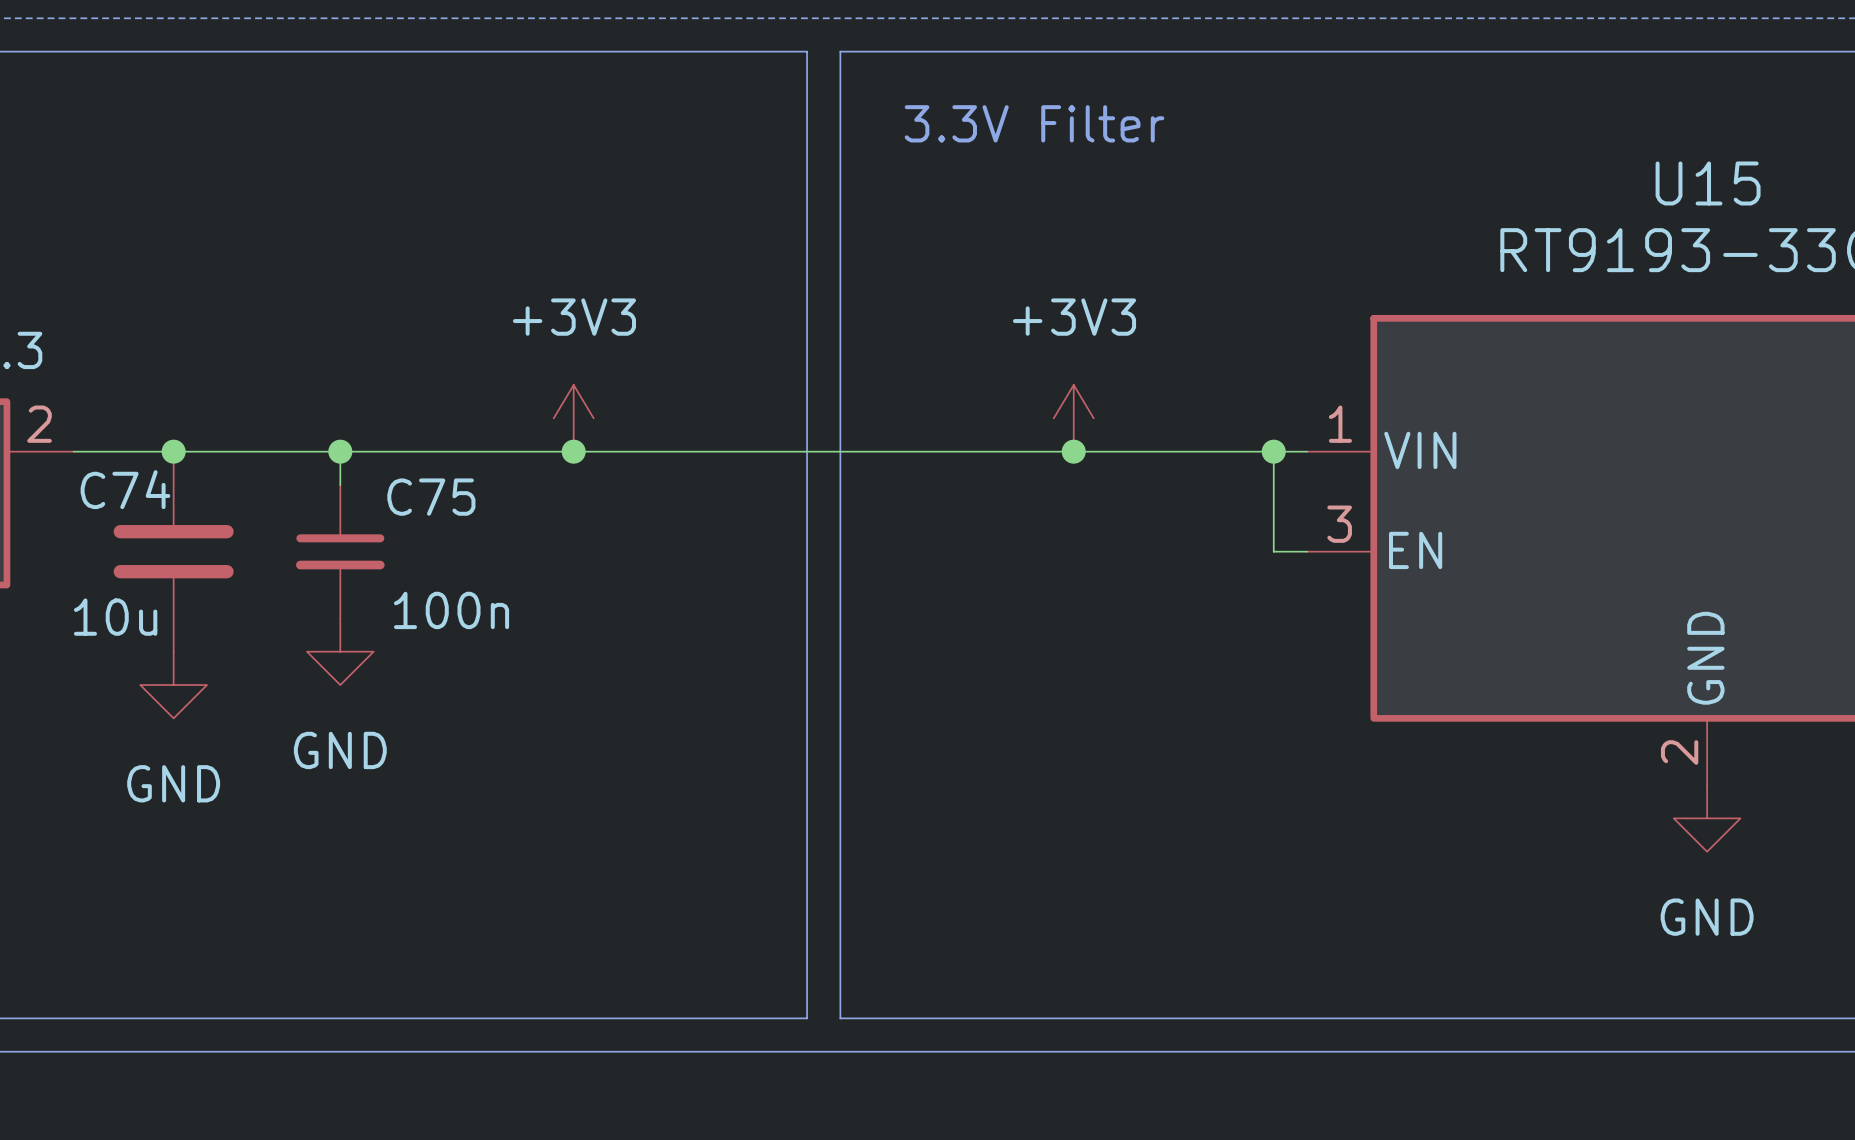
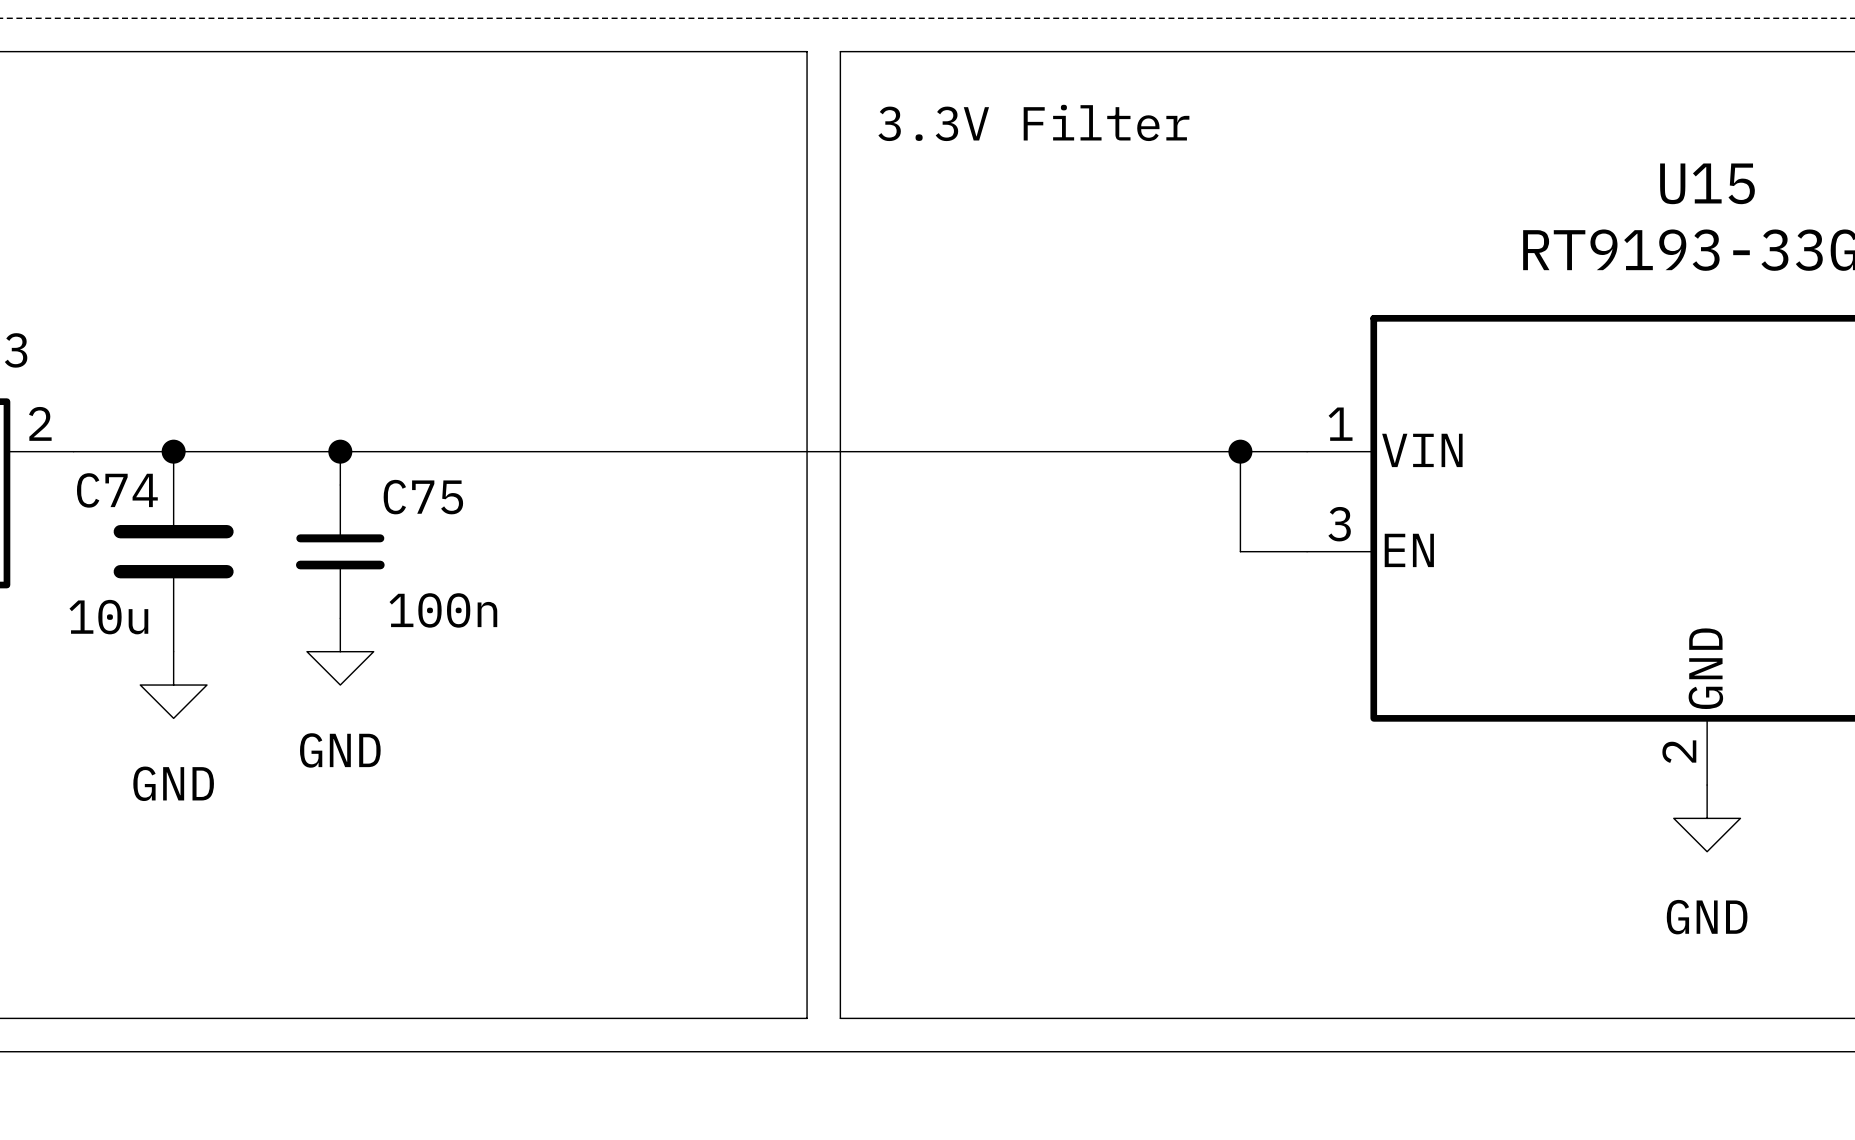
power symbol: +3V3 (573, 418) -> none
power symbol: +3V3 (1073, 418) -> none
junction: (573, 451) -> none
junction: (1073, 451) -> none
wire: (1273, 451) (1273, 551) -> (1240, 451) (1240, 551) (1273, 551)
junction position: (1273, 451) -> (1240, 451)

